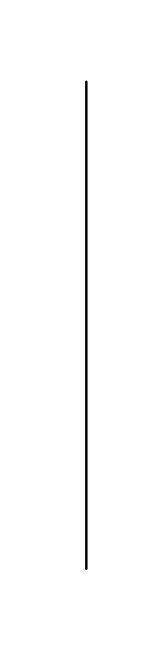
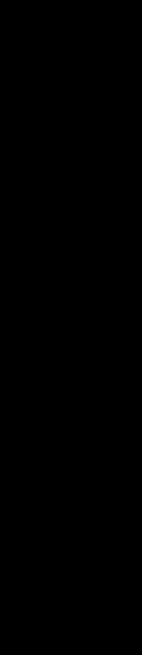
board edge: (86, 81) (86, 568) -> none

